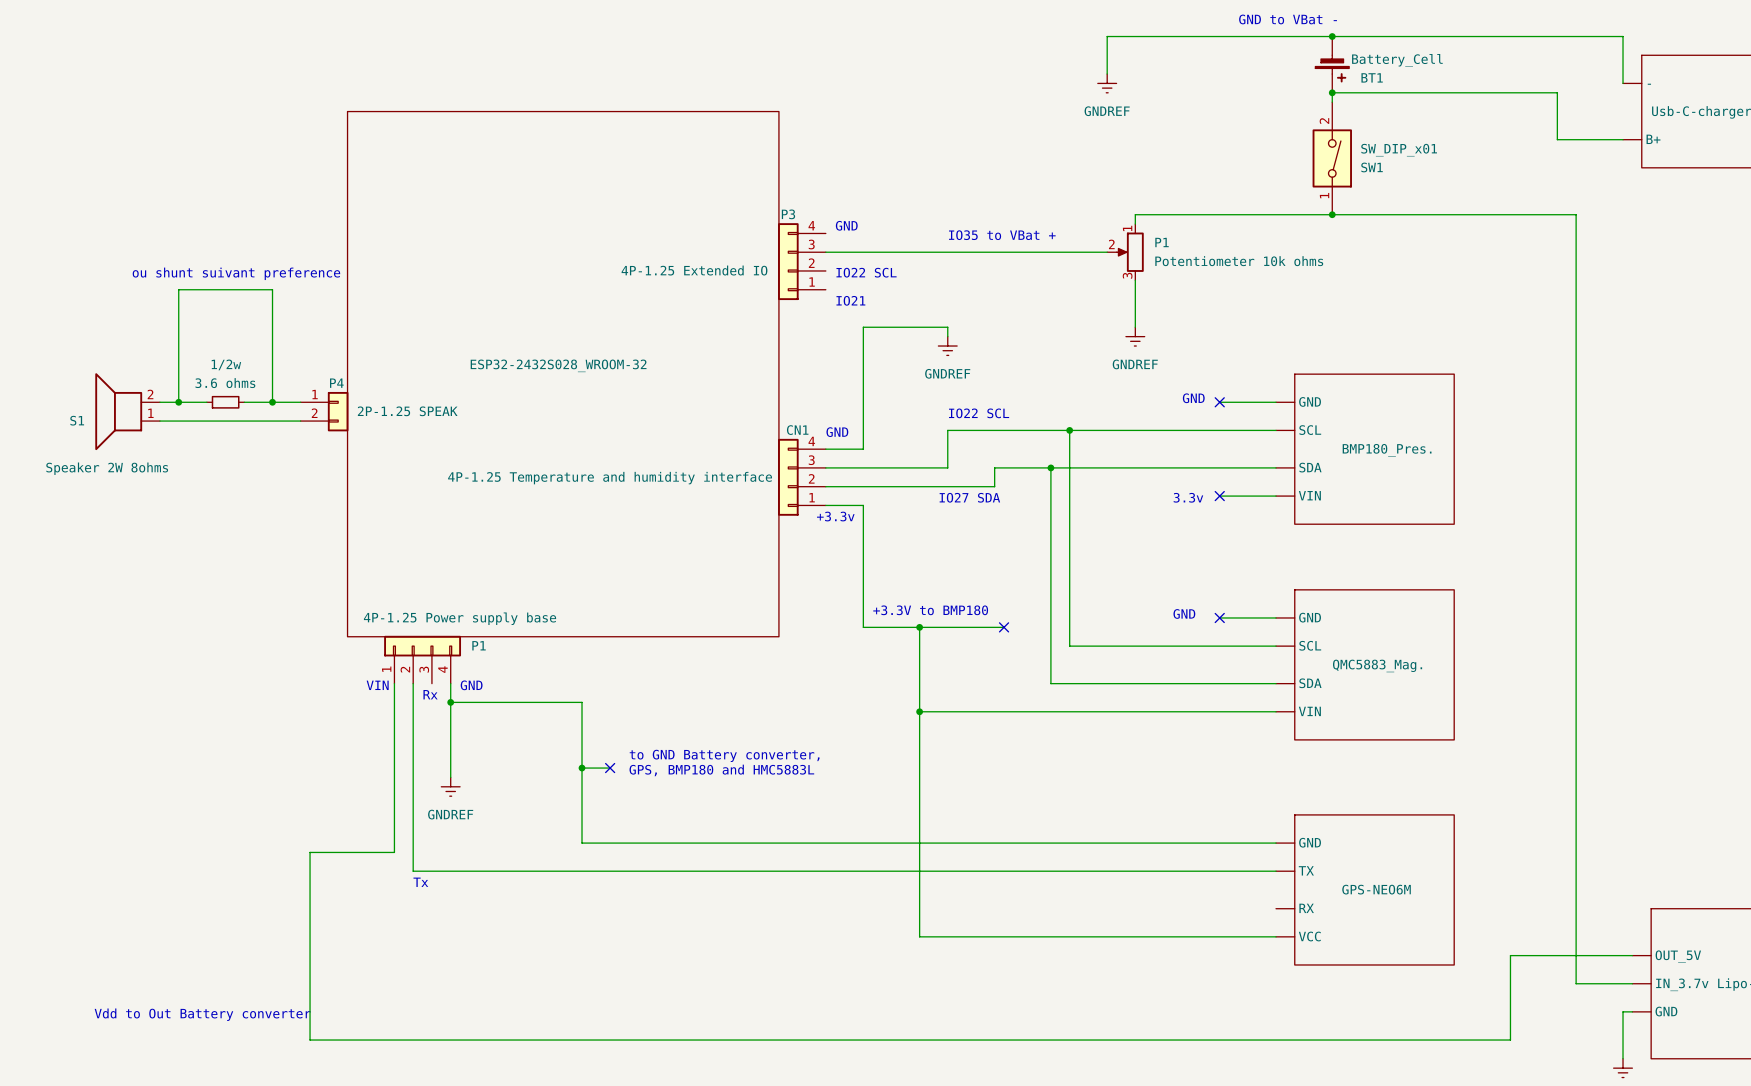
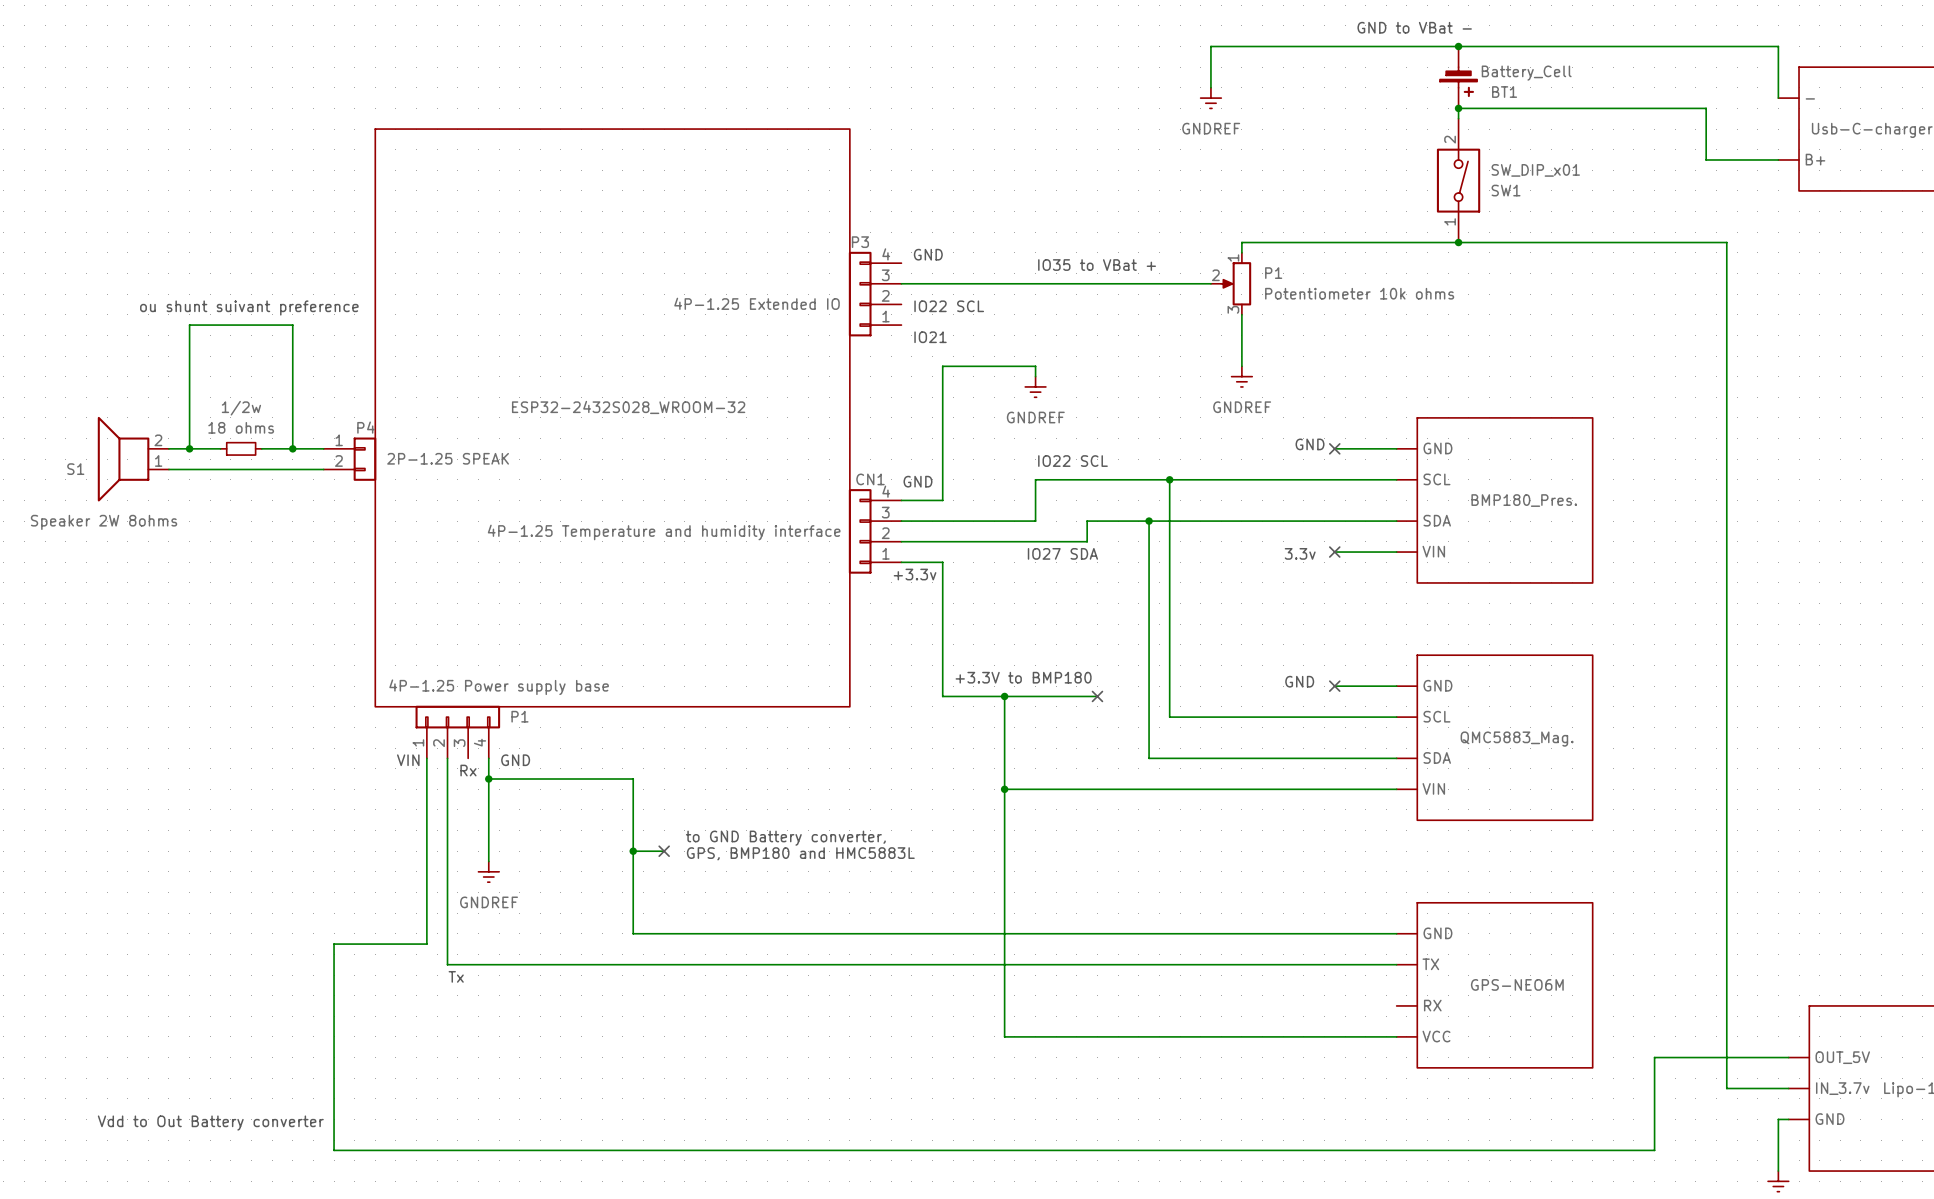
1/2w value: 3.6 ohms (225, 383) -> 18 ohms (241, 427)

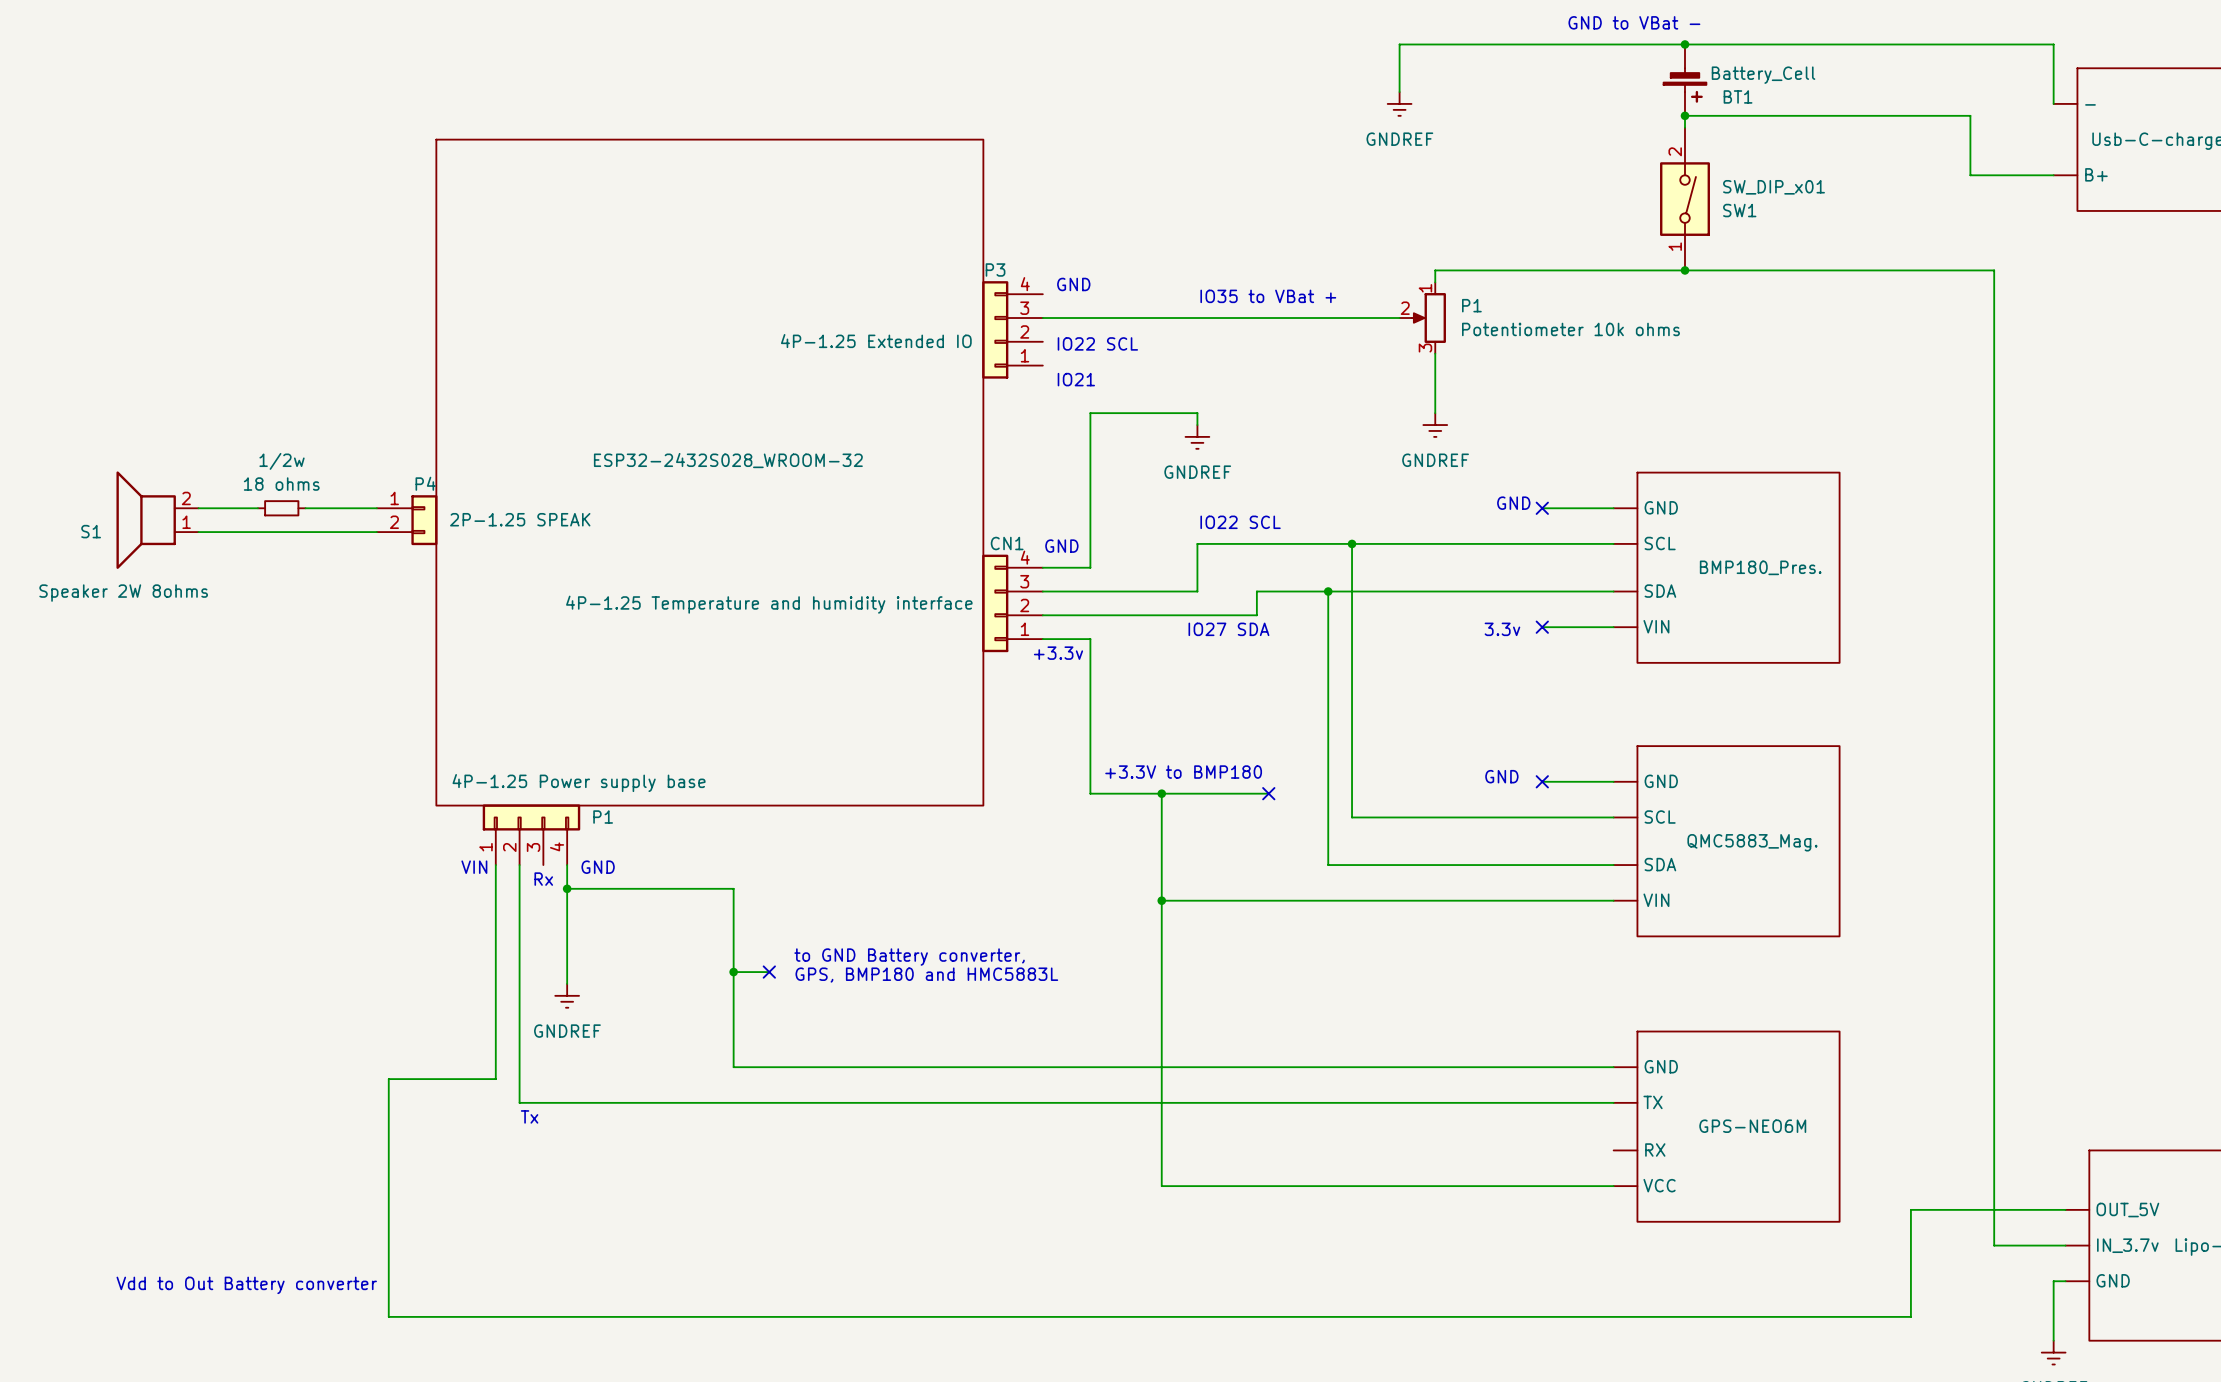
text: ou shunt suivant preference (249, 308) -> none
wire: (189, 448) (189, 325) (292, 325) (292, 448) -> none
junction: (189, 448) -> none
junction: (292, 448) -> none

